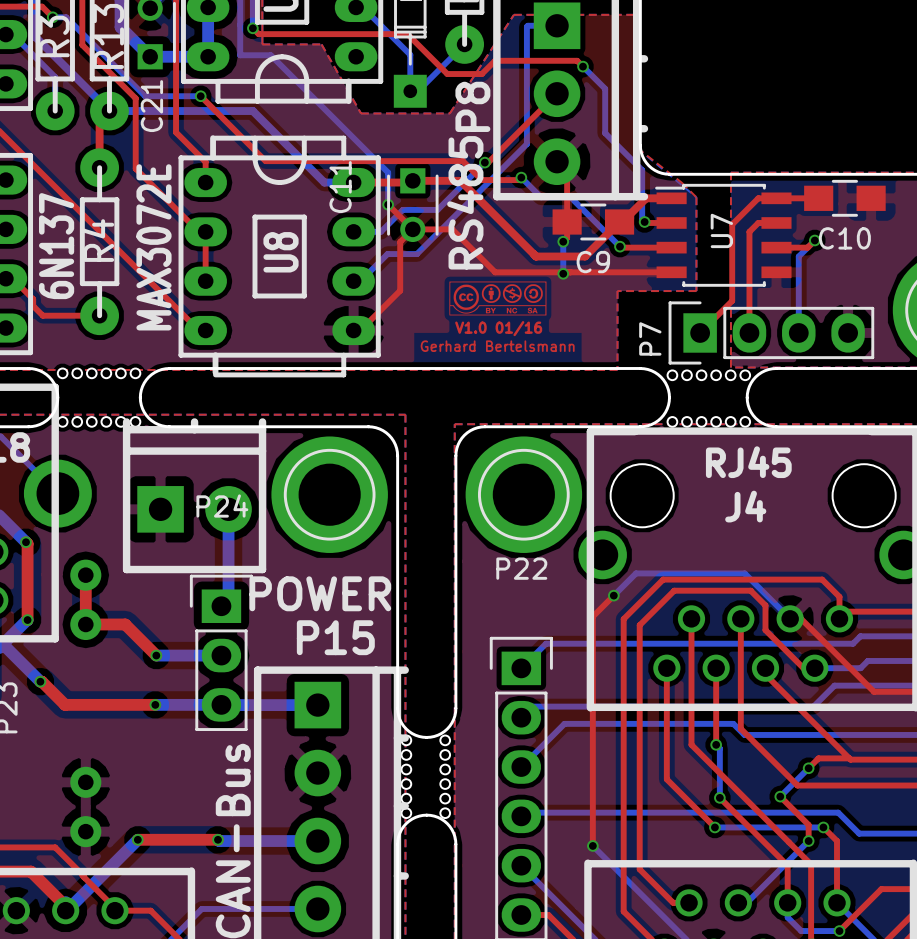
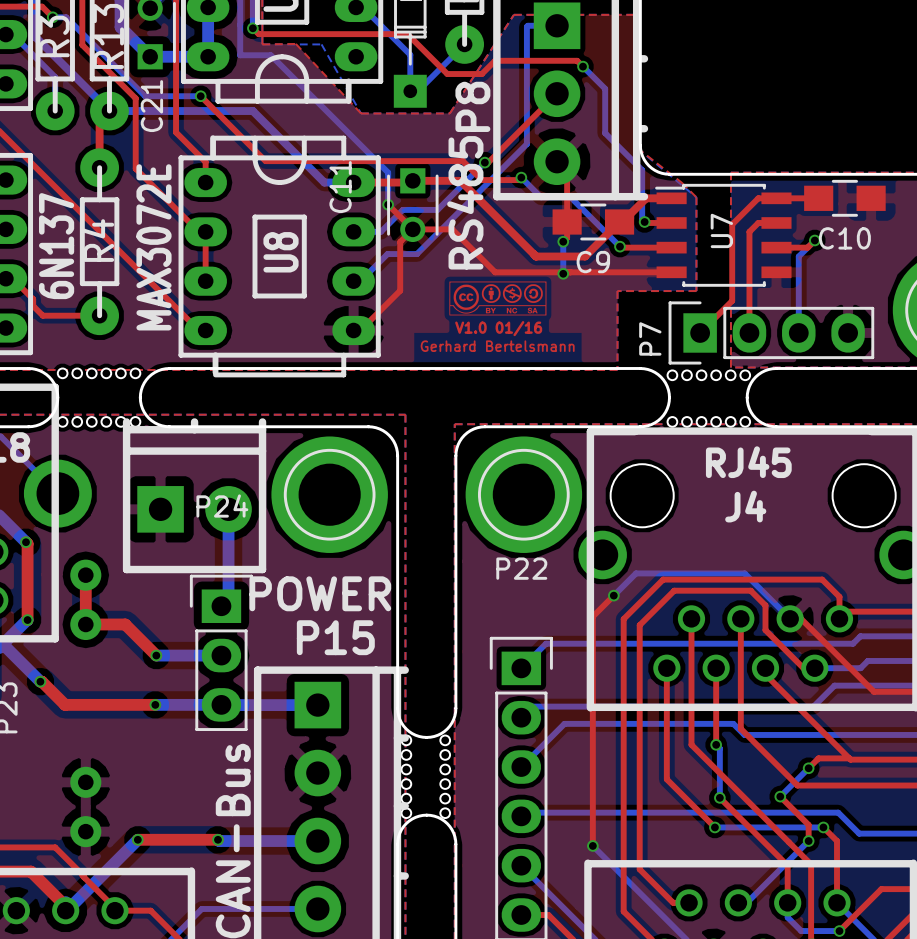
top zone outline: (262, 44) (321, 44) (361, 113) -> (262, 44) (295, 43) (361, 113)

